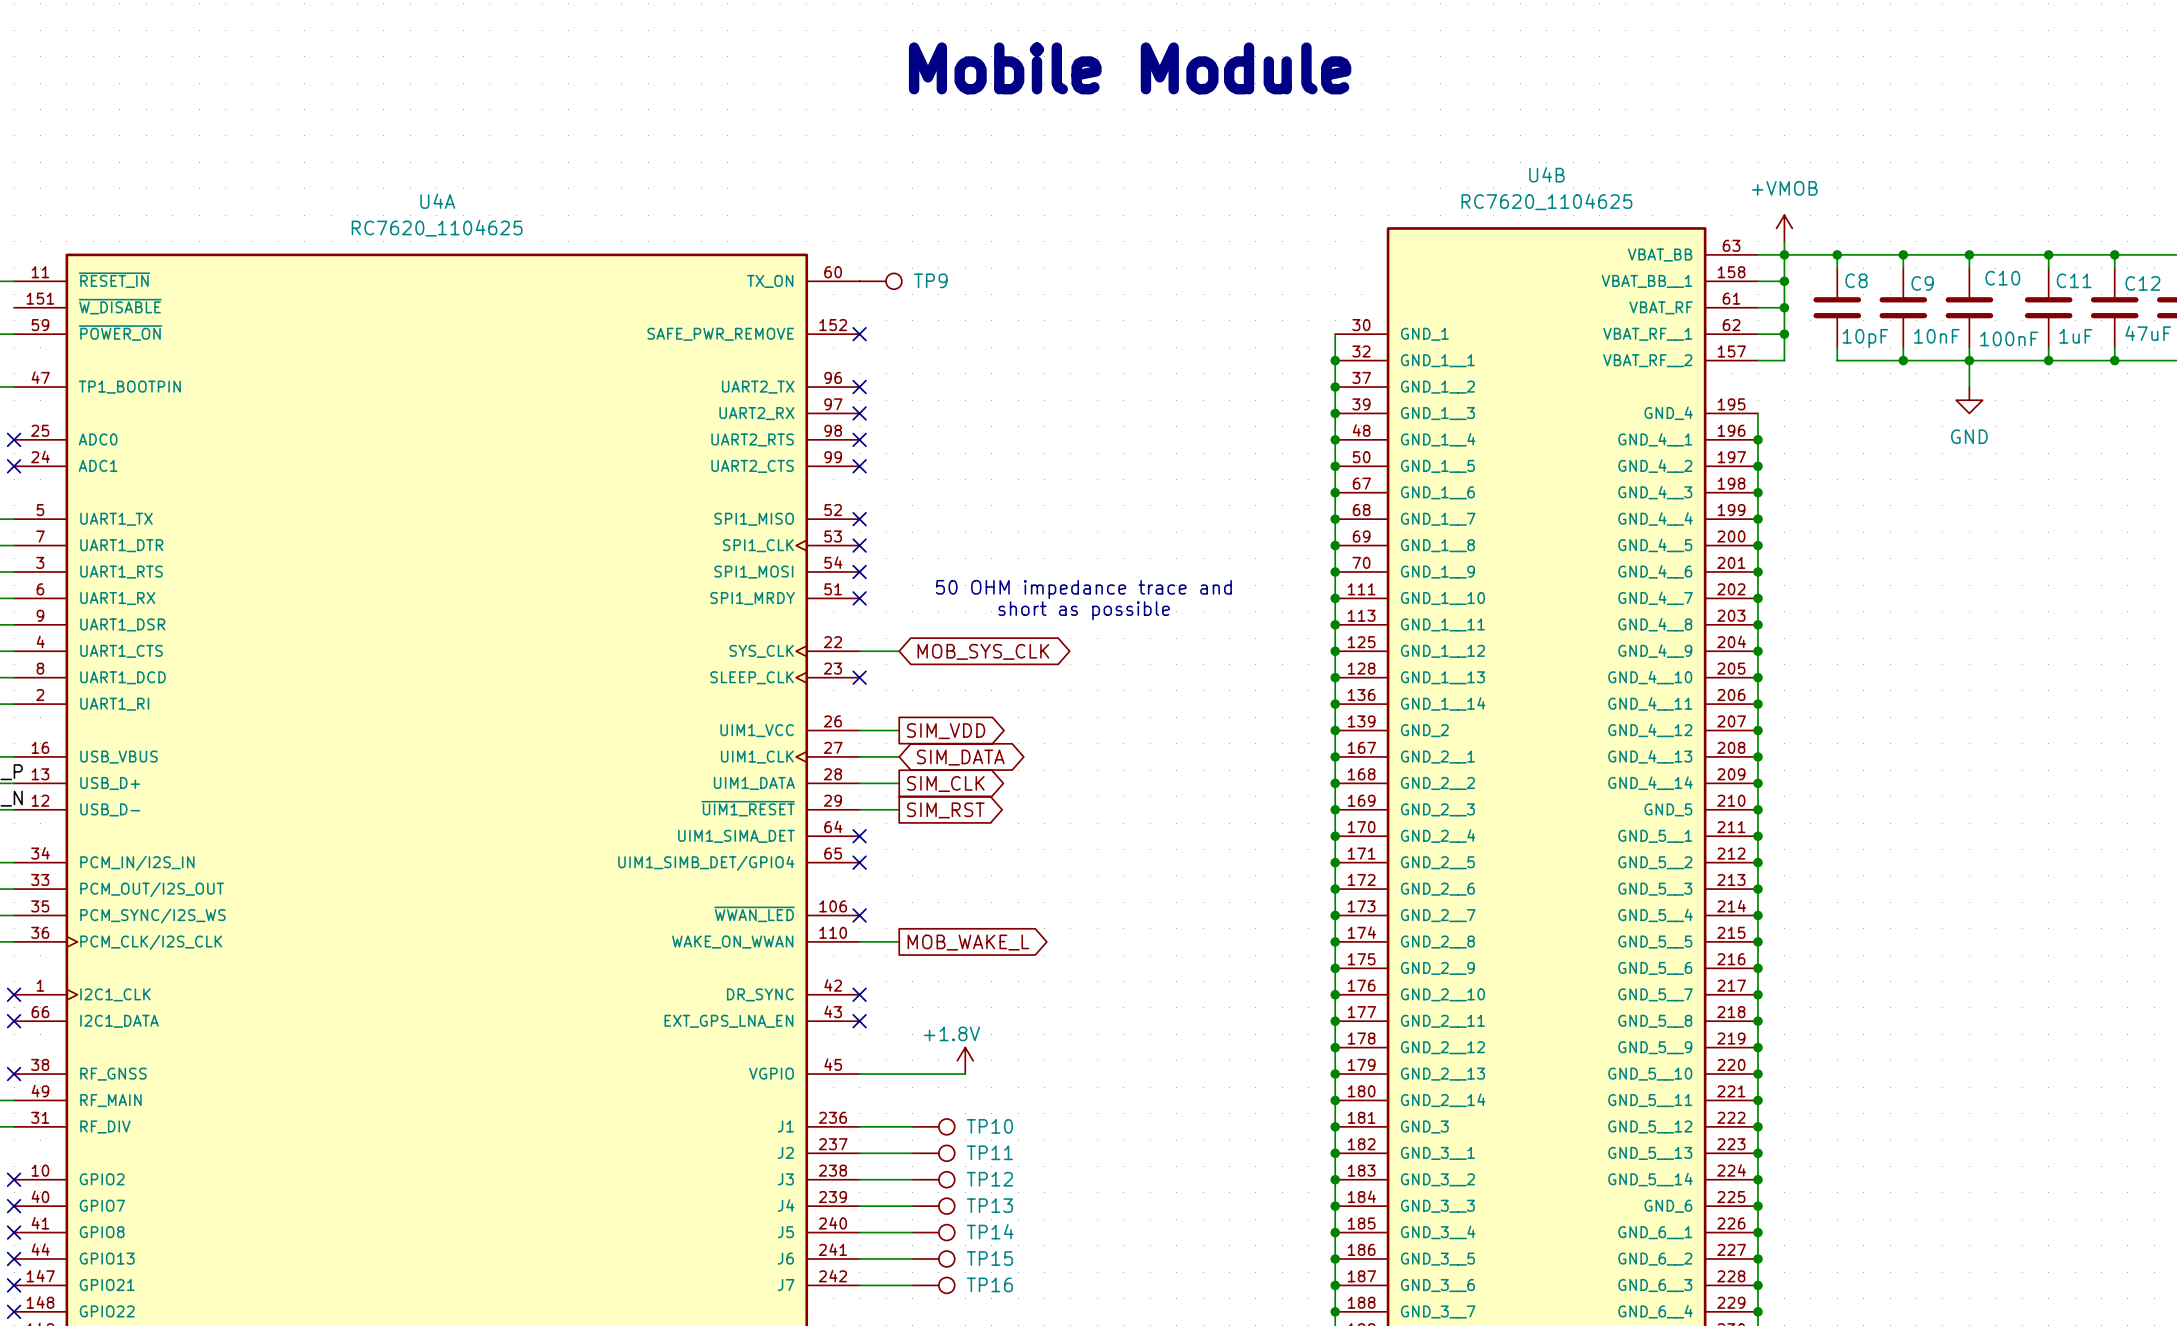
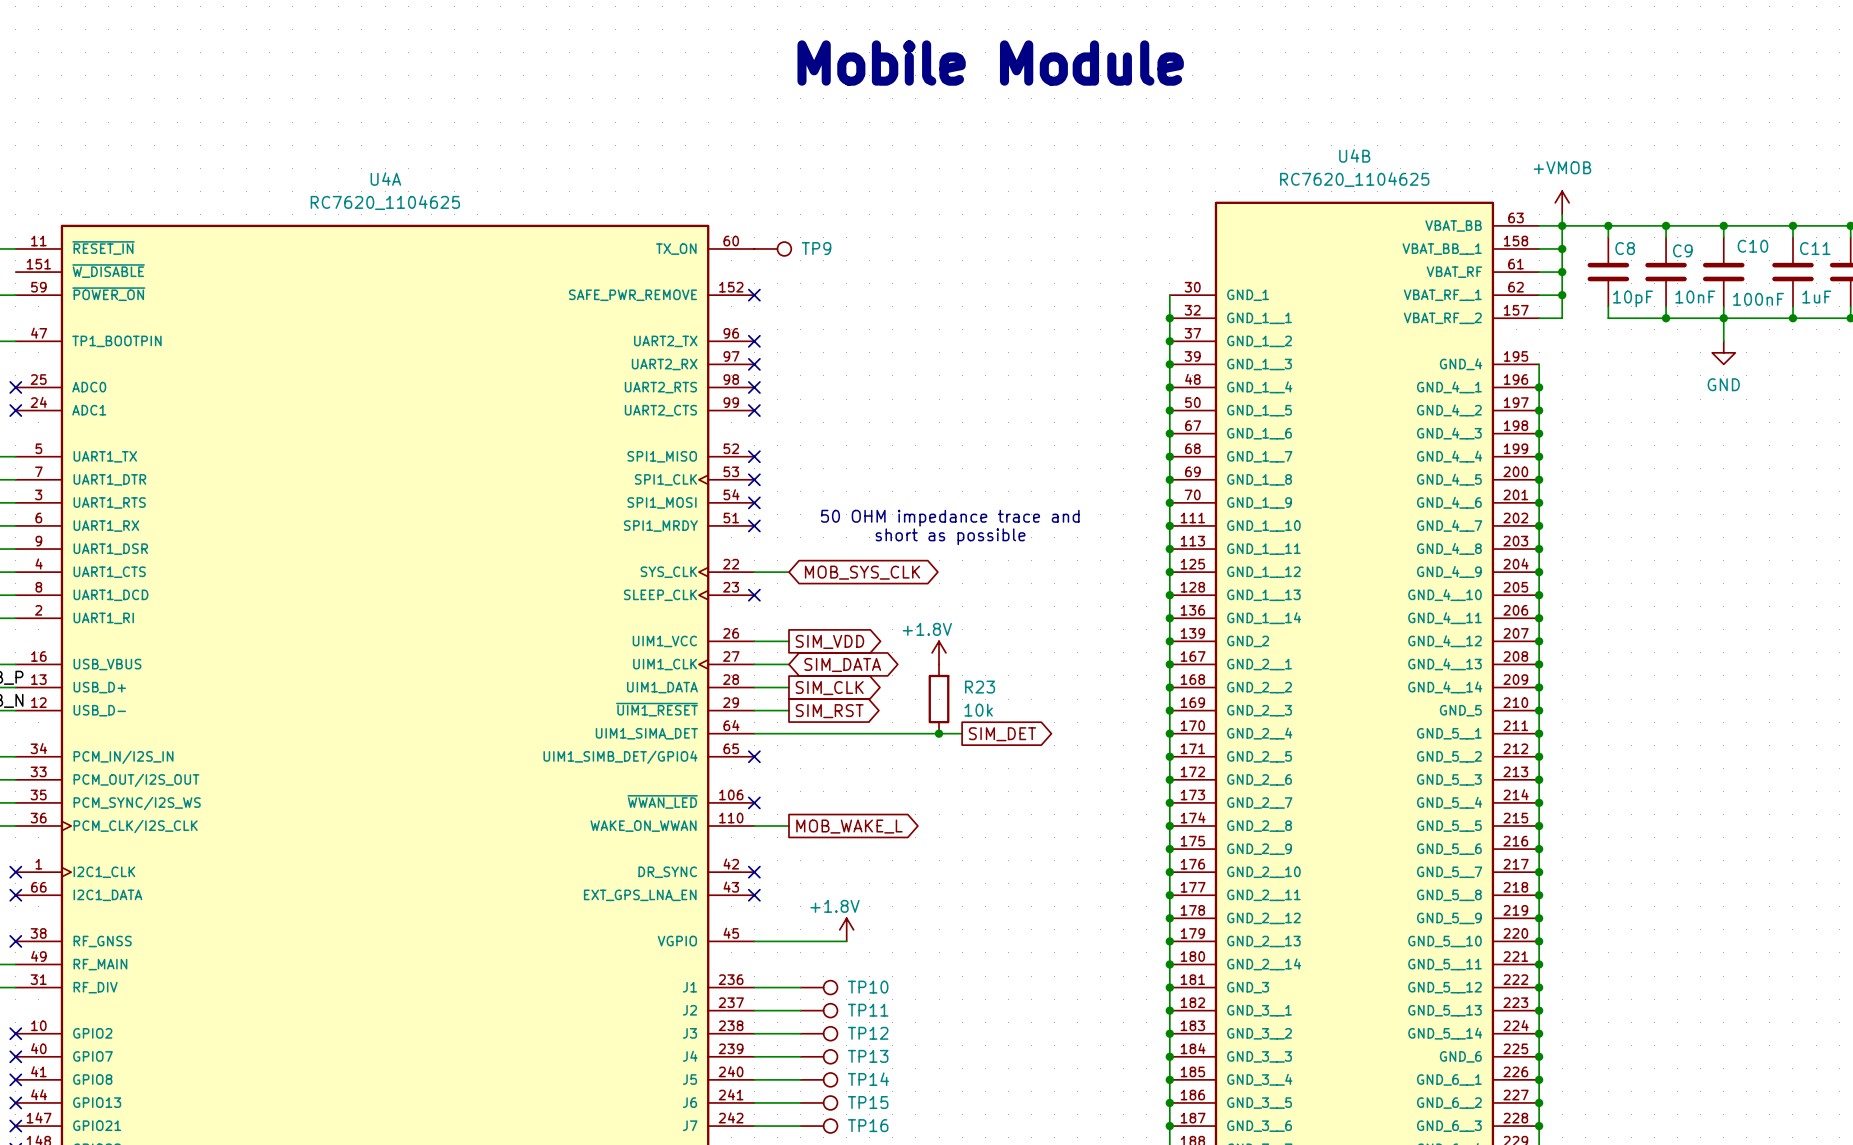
power symbol: none -> +1.8V (939, 652)
R23: none -> 10k (939, 699)
wire: none -> (754, 733) (962, 733)
no-connect mark: (859, 836) -> none
junction: none -> (939, 733)
global label: none -> SIM_DET (1002, 734)

